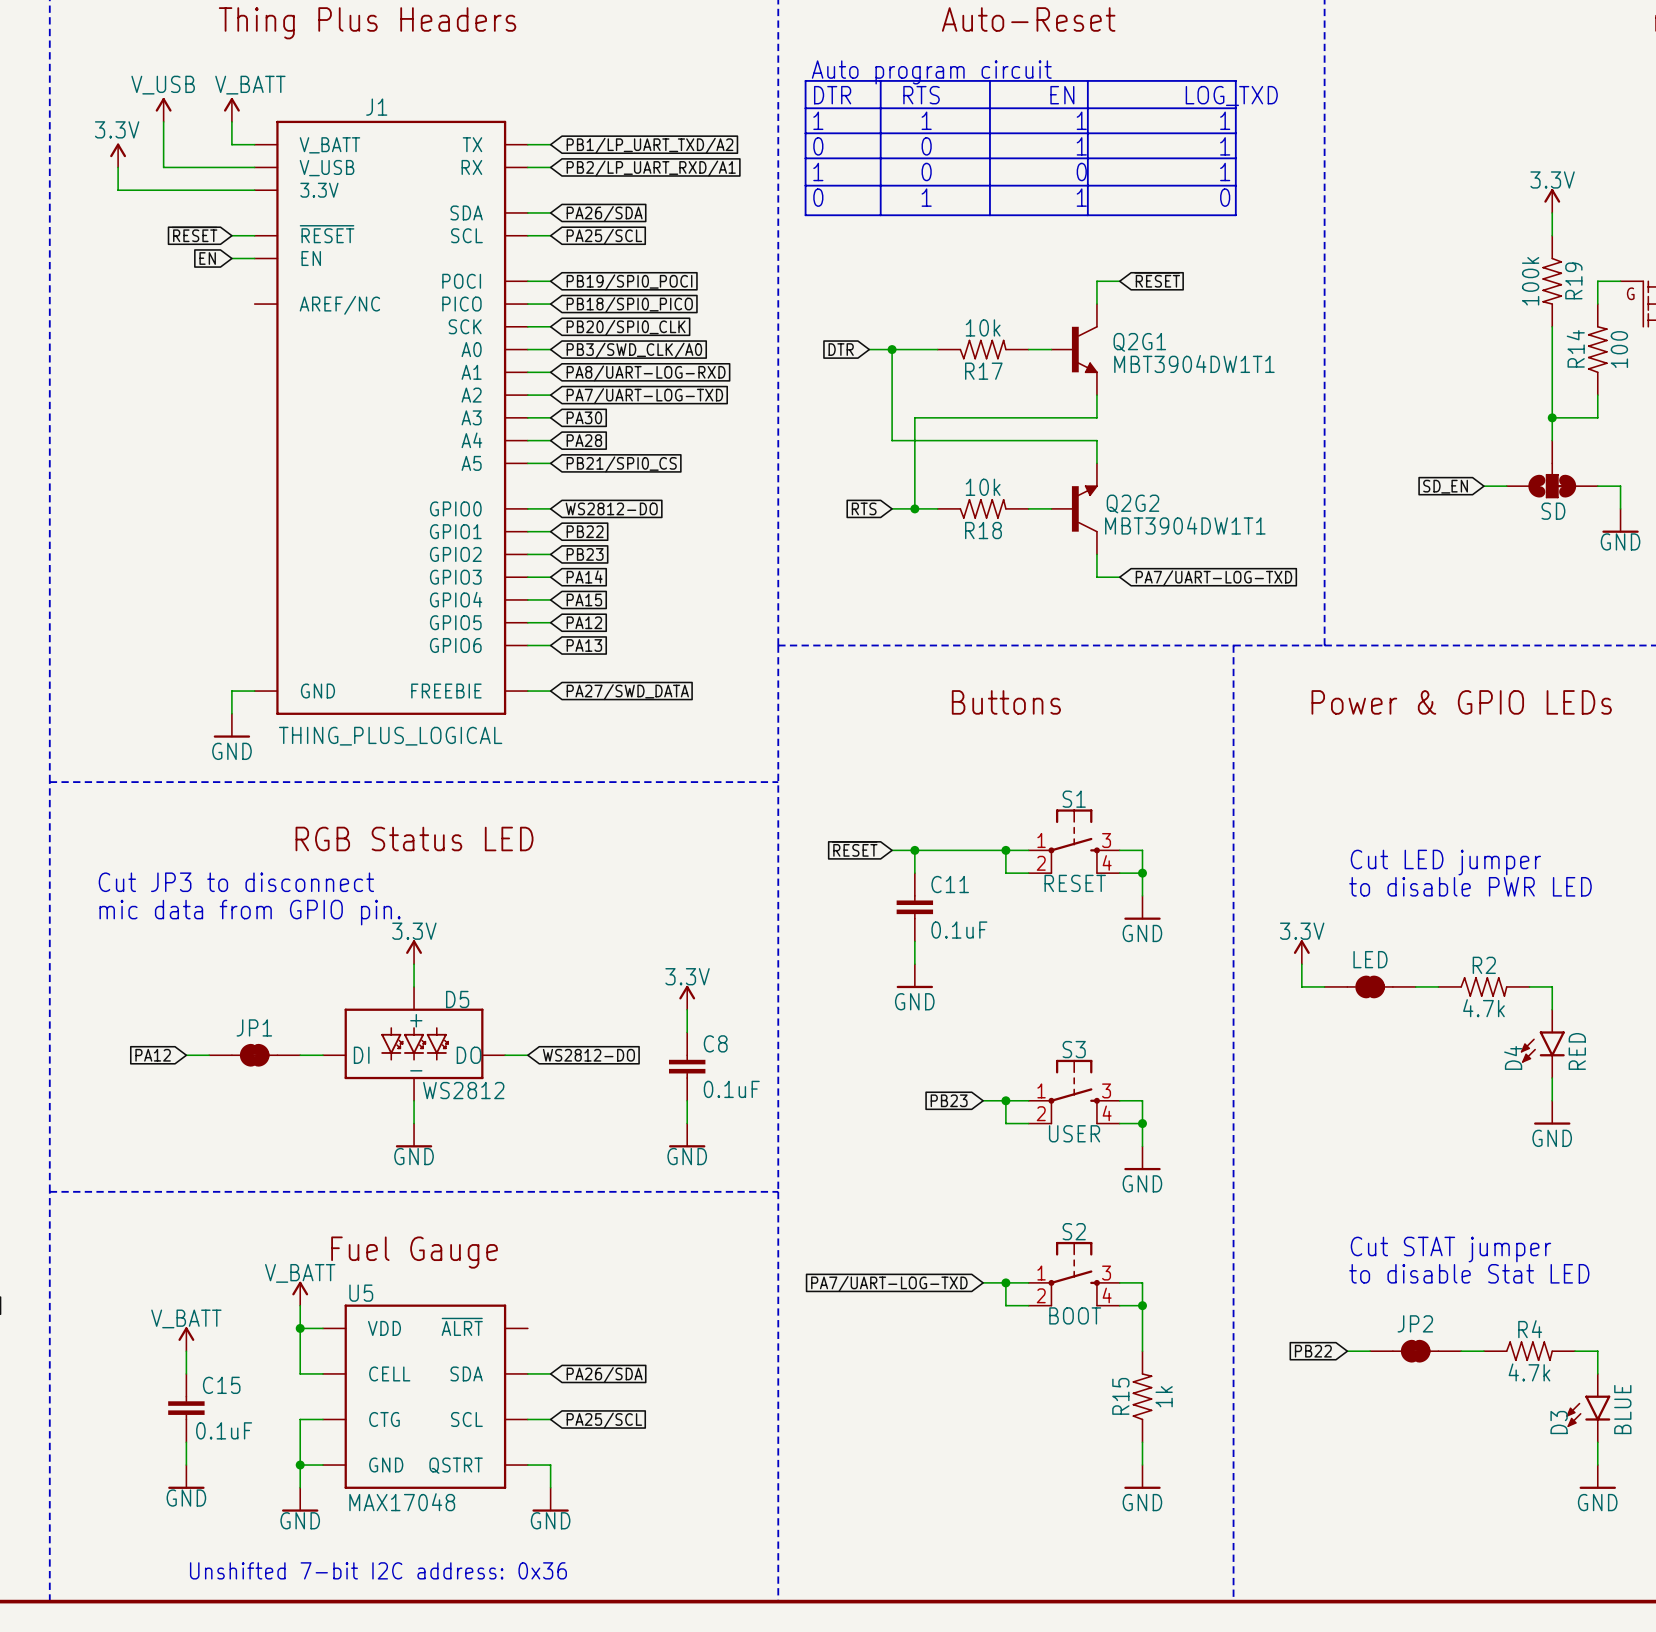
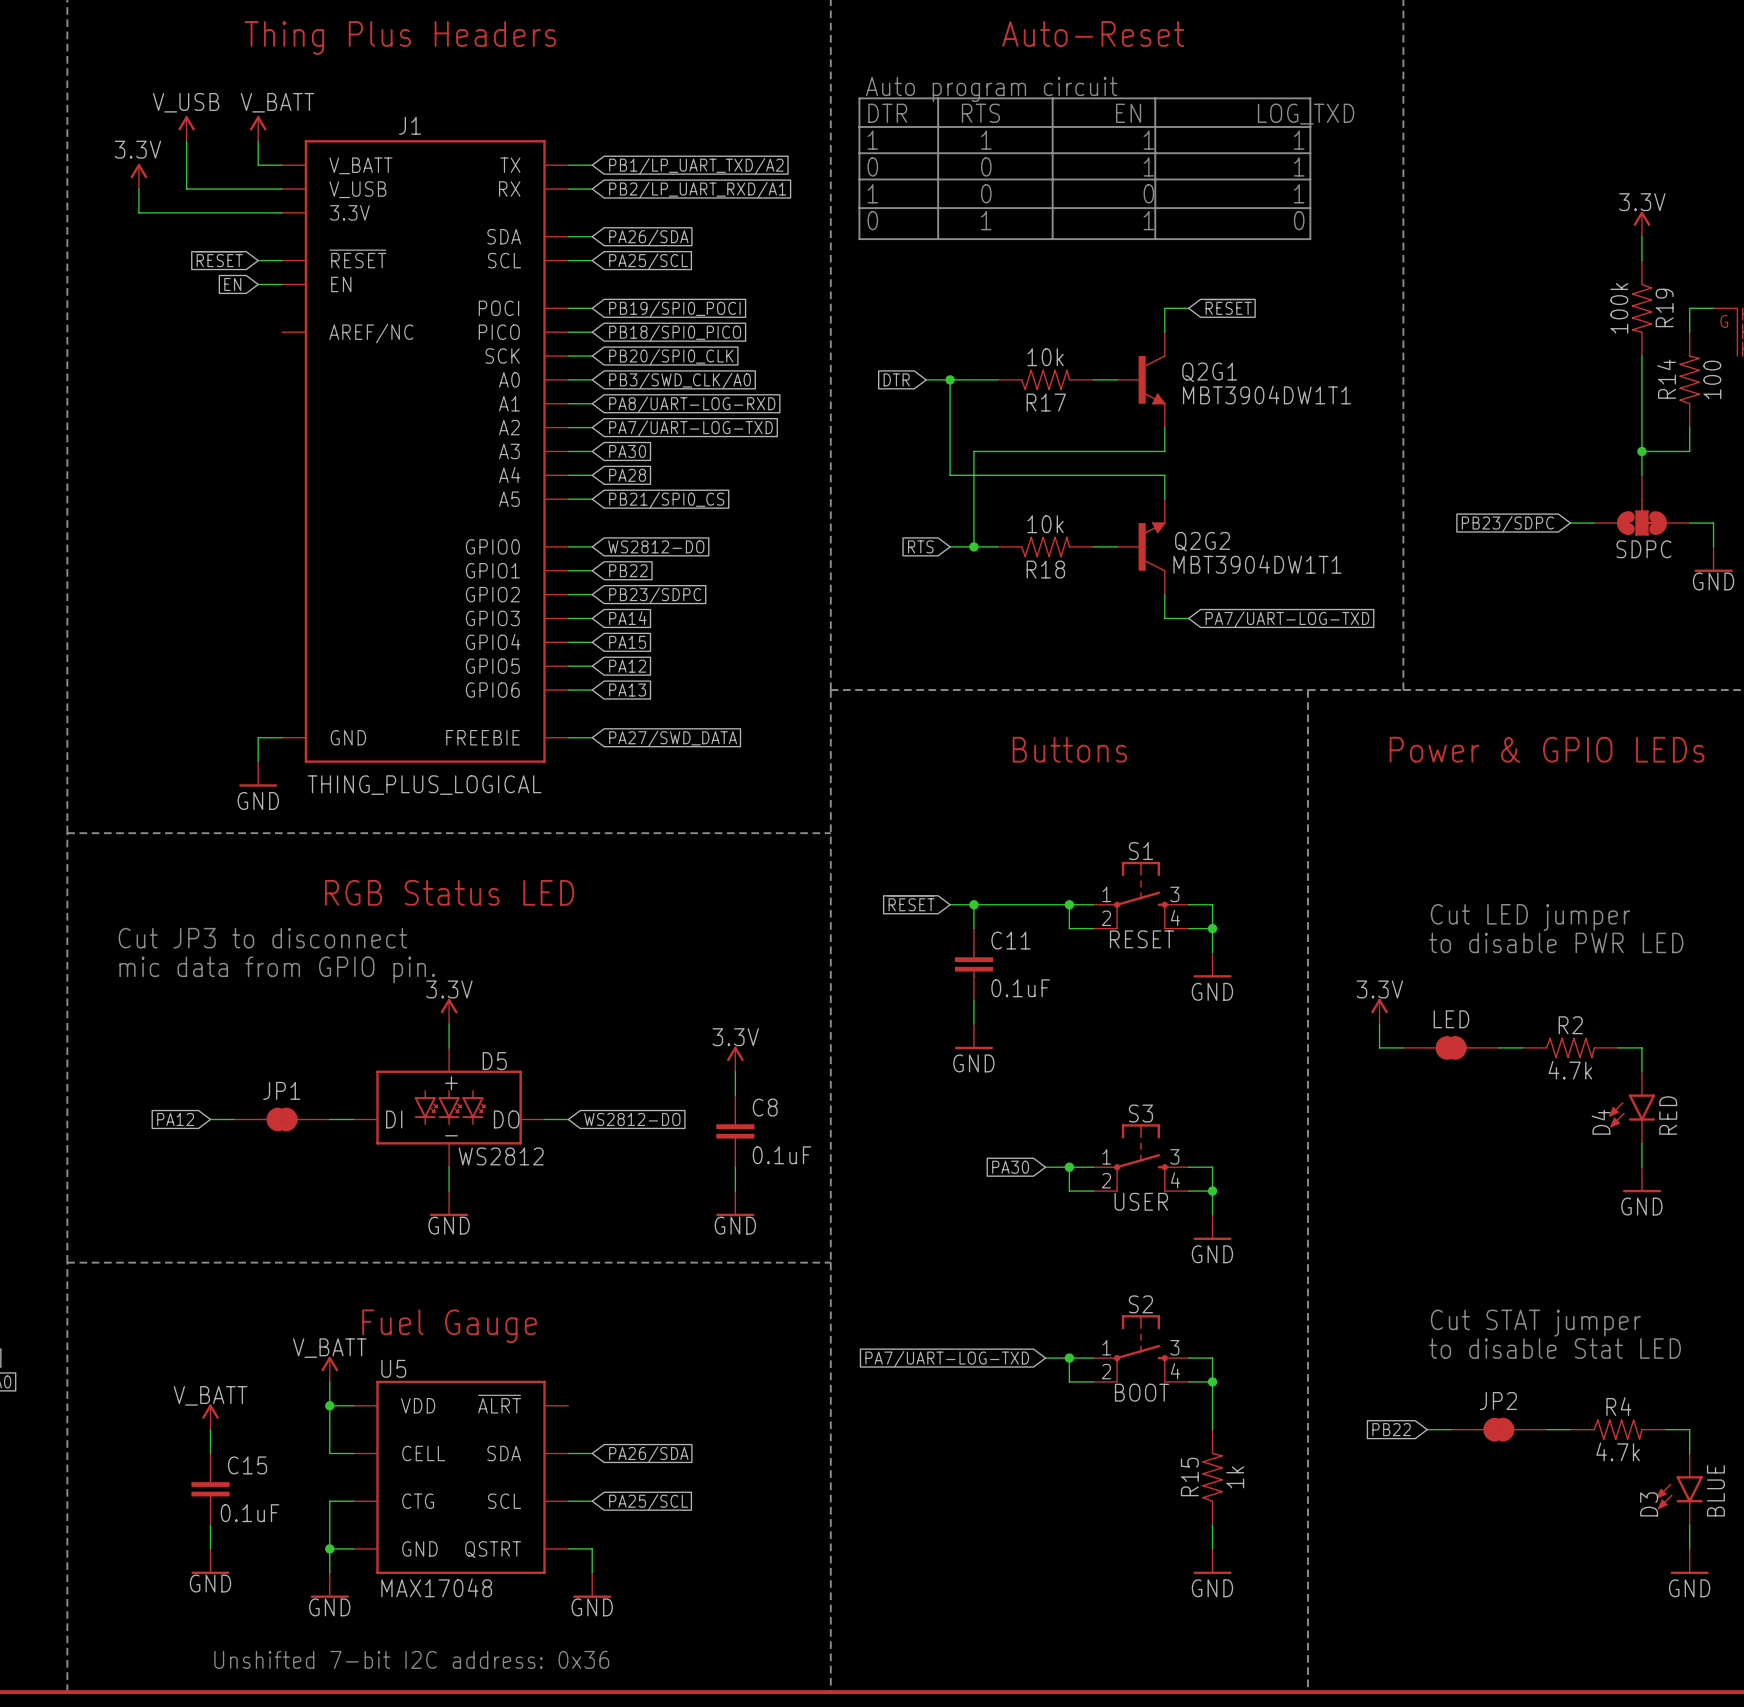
global label: SD_EN (1445, 486) -> PB23/SDPC (1507, 524)
SD name: SD (1553, 511) -> SDPC (1643, 549)
global label: PB23 (585, 554) -> PB23/SDPC (655, 595)
global label: PB23 (949, 1100) -> PA30 (1010, 1167)

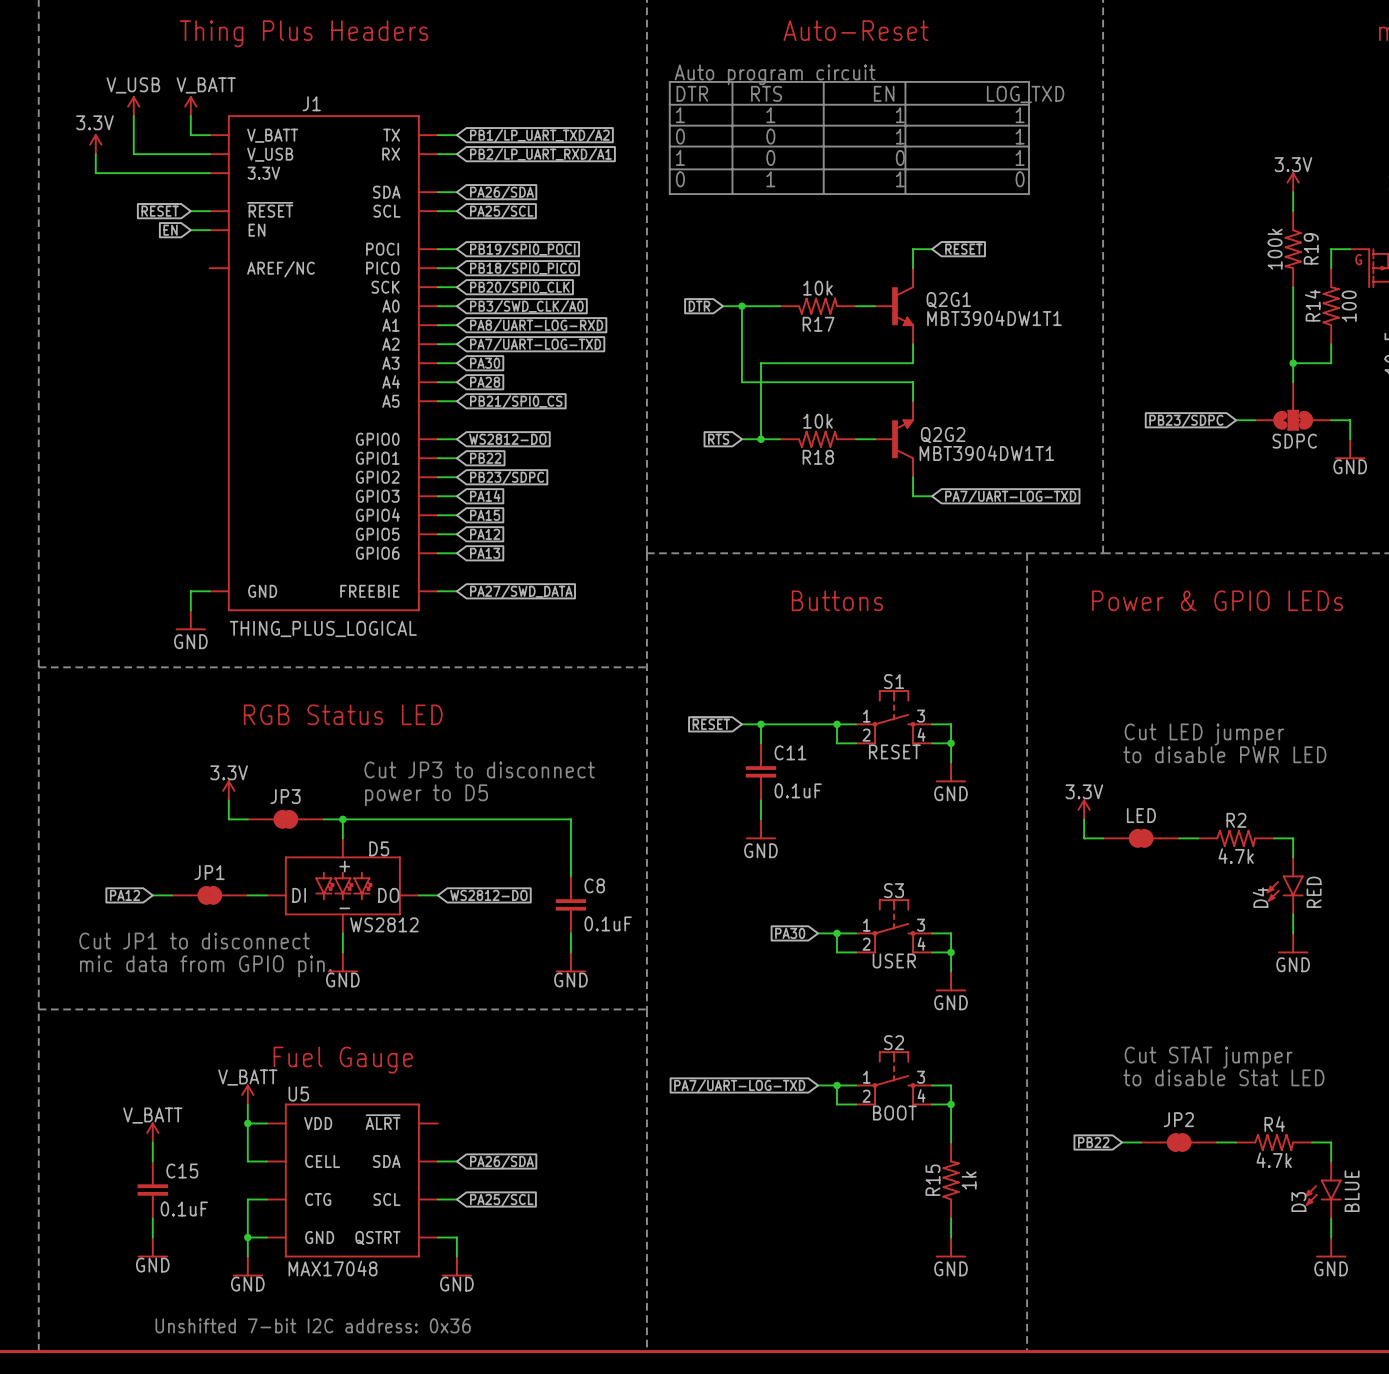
text: Cut JP3 to disconnect (262, 938) -> none
text: none -> Cut JP3 to disconnect (479, 769)
text: mic data from GPIO pin. (277, 969) -> none
text: none -> power to D5 (426, 795)
wire: none -> (228, 800) (228, 819) (247, 819)
power symbol position: 3.3V (449, 1011) -> 3.3V (228, 790)
JP3: none -> (285, 819)
wire: none -> (323, 819) (570, 819) (570, 857)
junction: none -> (342, 819)
power symbol: 3.3V (735, 1059) -> none
text: none -> Cut JP1 to disconnect (194, 941)
text: none -> mic data from GPIO pin. (205, 966)

